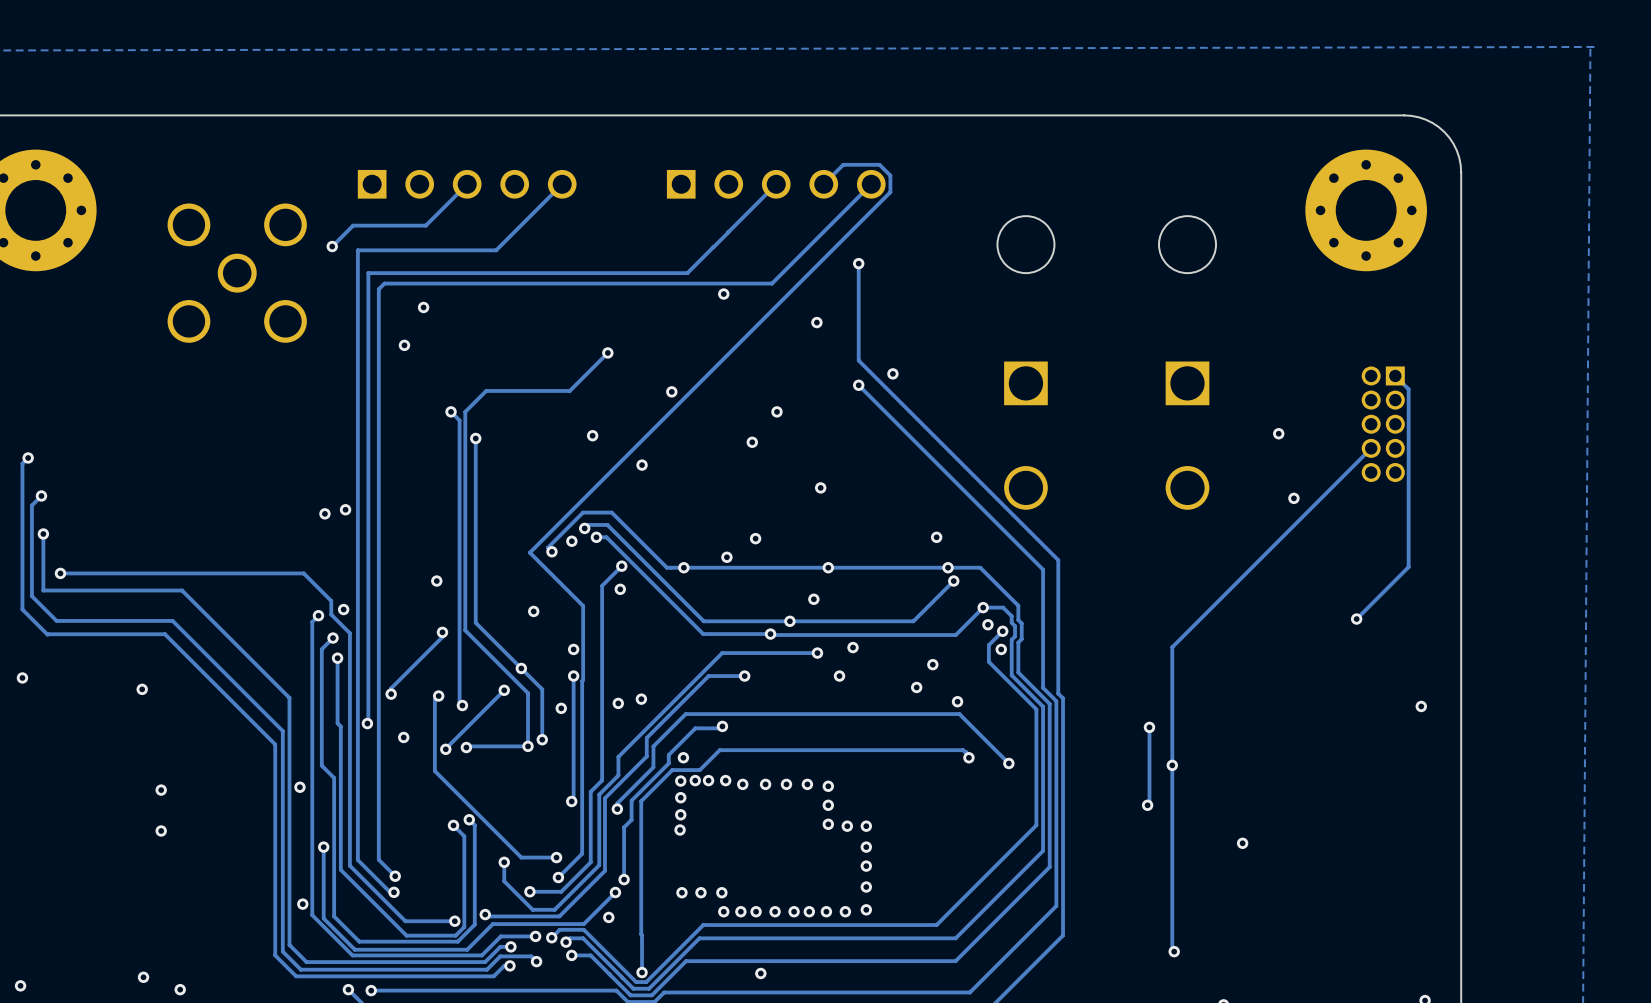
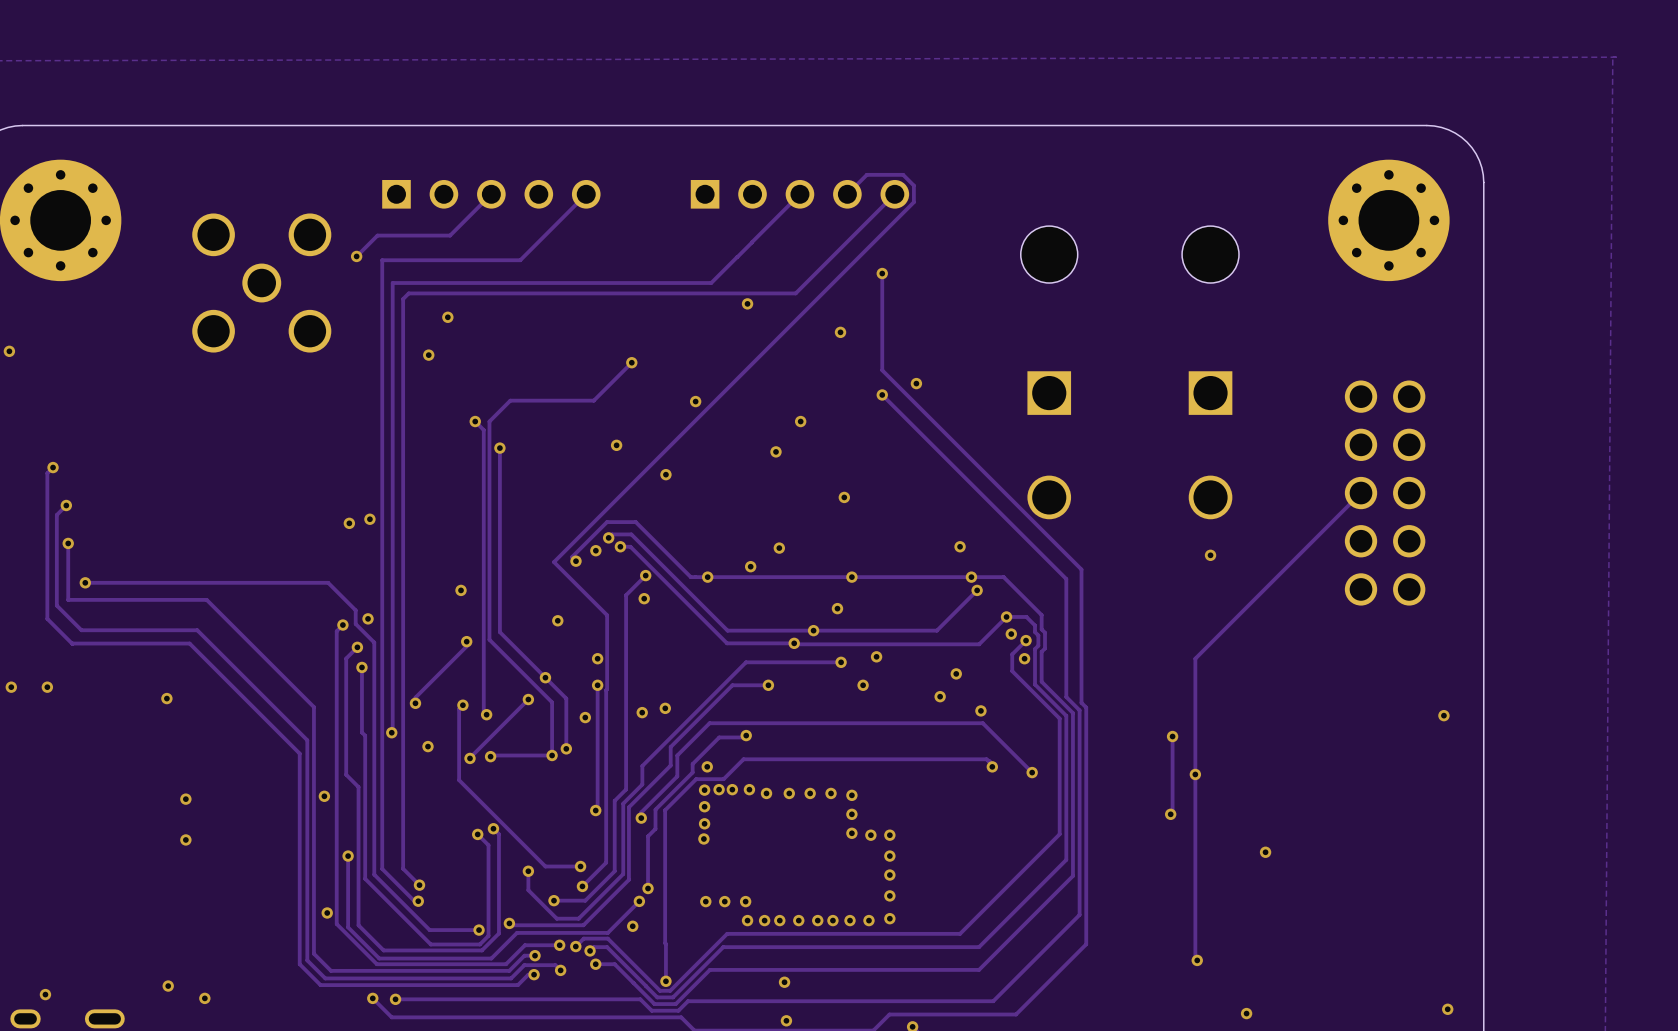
track: (1395, 375) (1408, 389) (1408, 567) (1356, 619) -> none
part: (1383, 424) -> none
via: (1278, 433) -> none
track: (1371, 448) (1172, 647) (1172, 649) -> (1361, 493) (1195, 658)
part: none -> (1385, 493)
via: (1293, 498) -> none
via: none -> (1210, 555)
via: (1356, 619) -> none

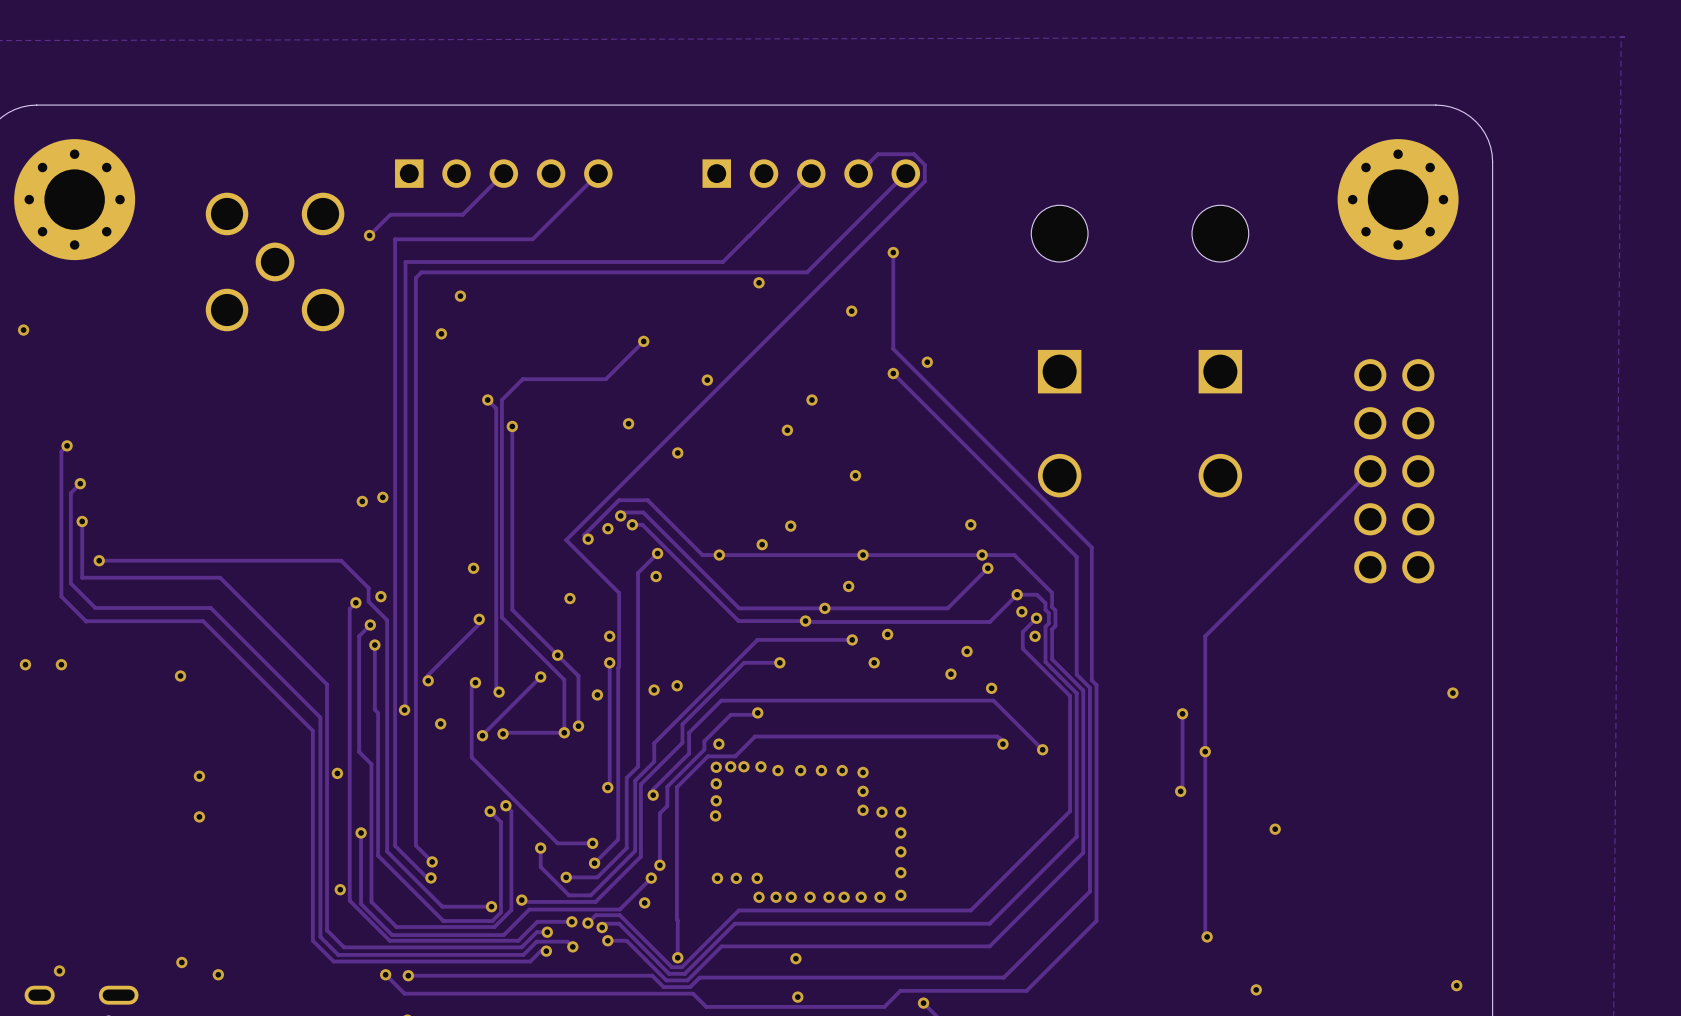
via: (1210, 555) -> none

